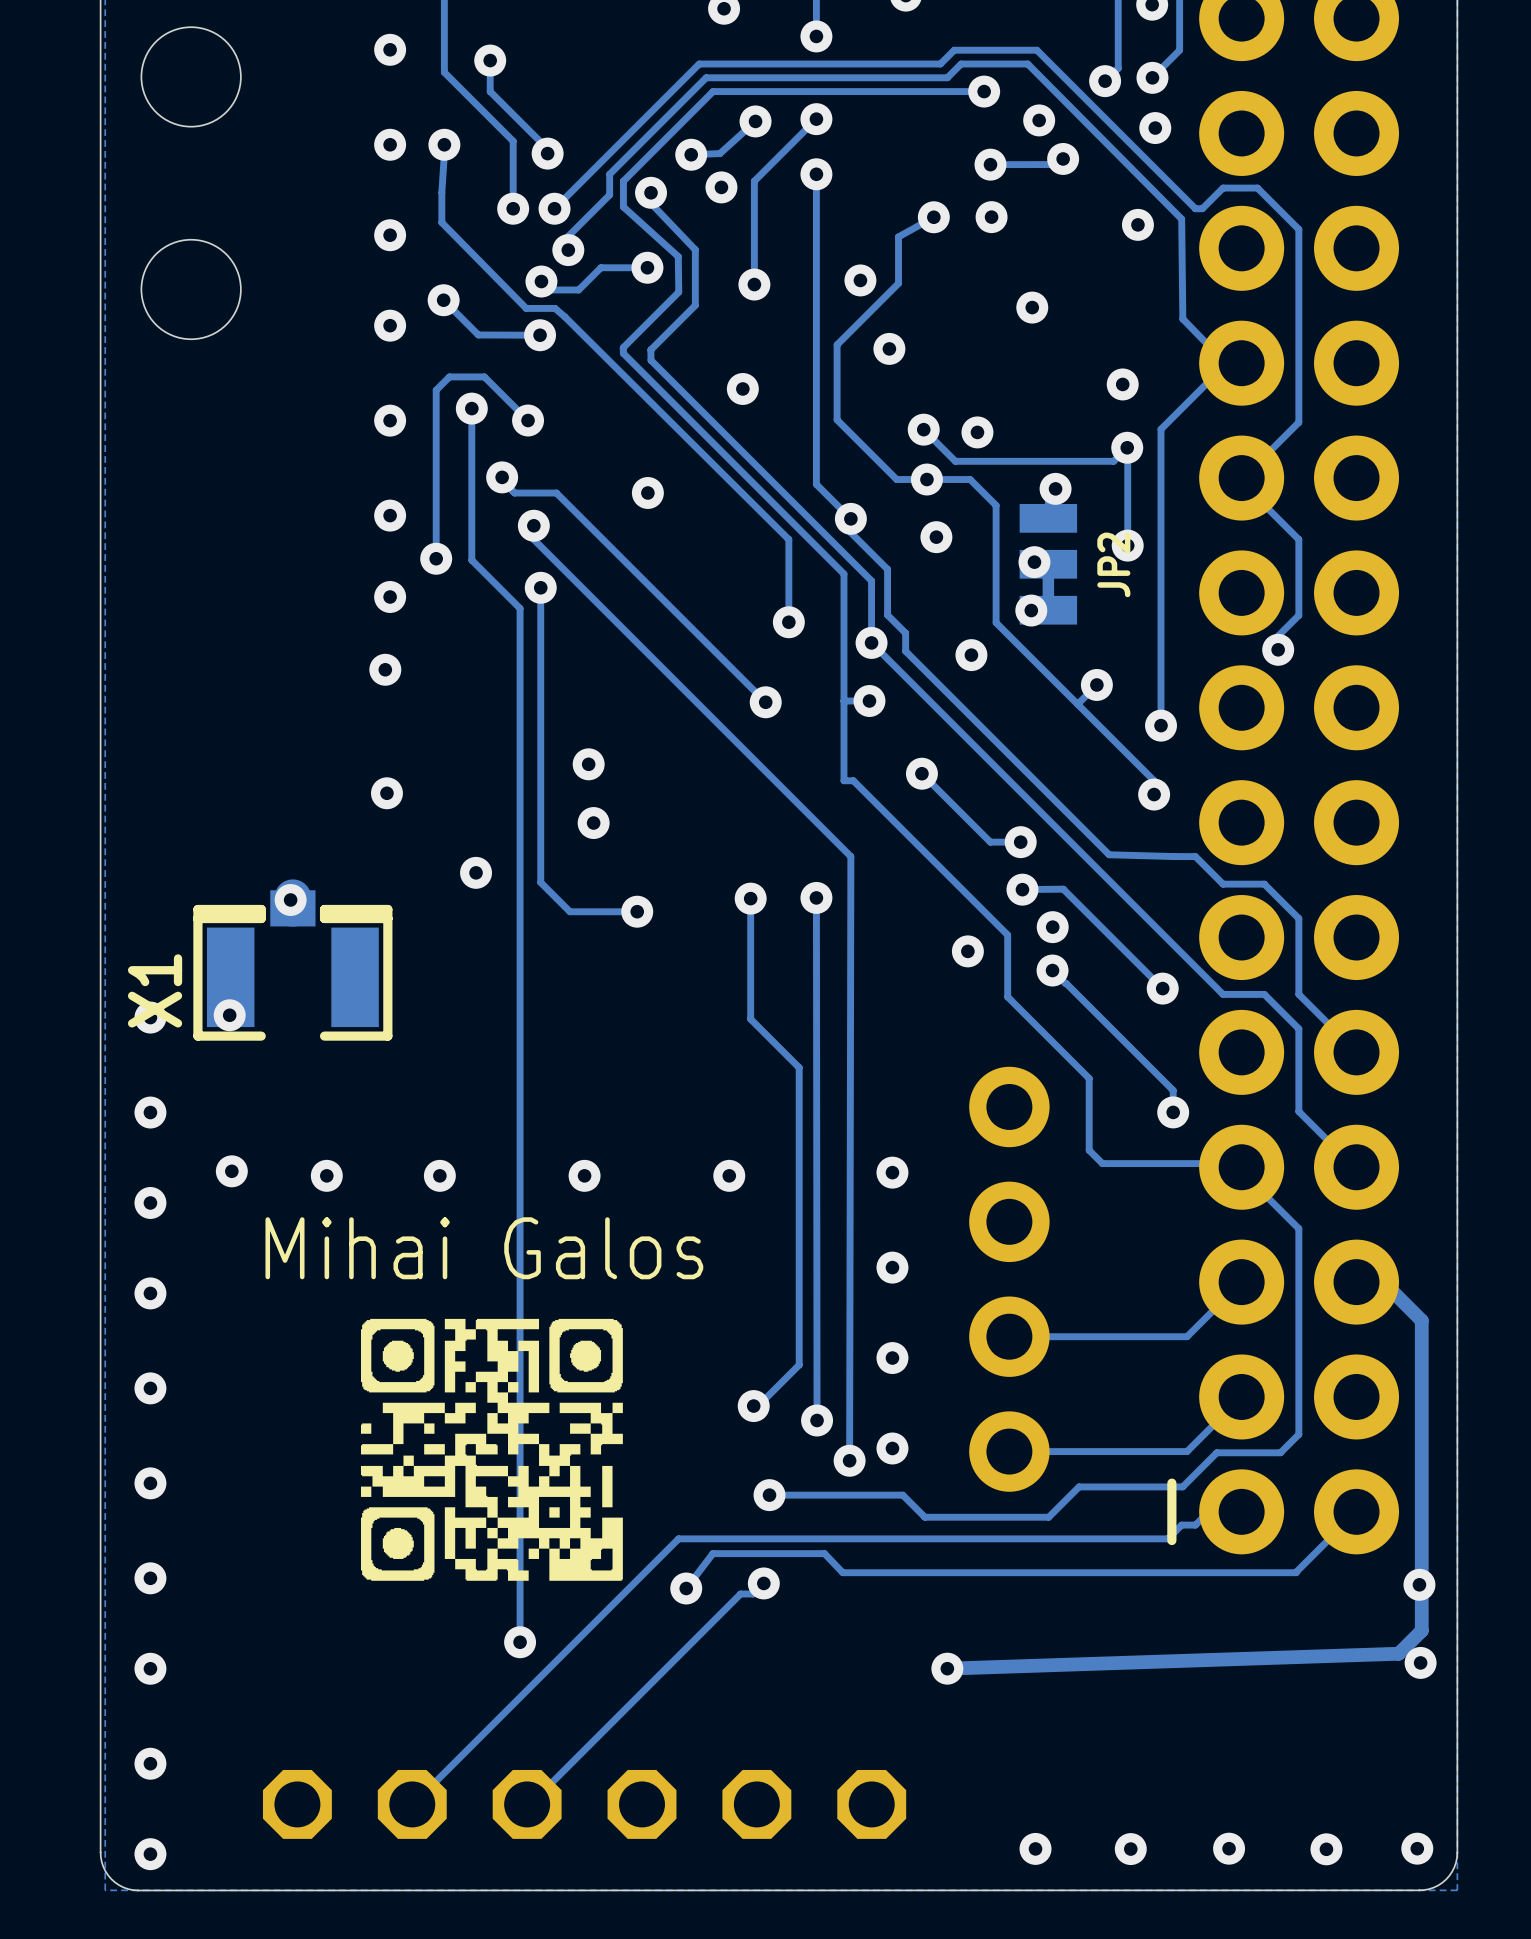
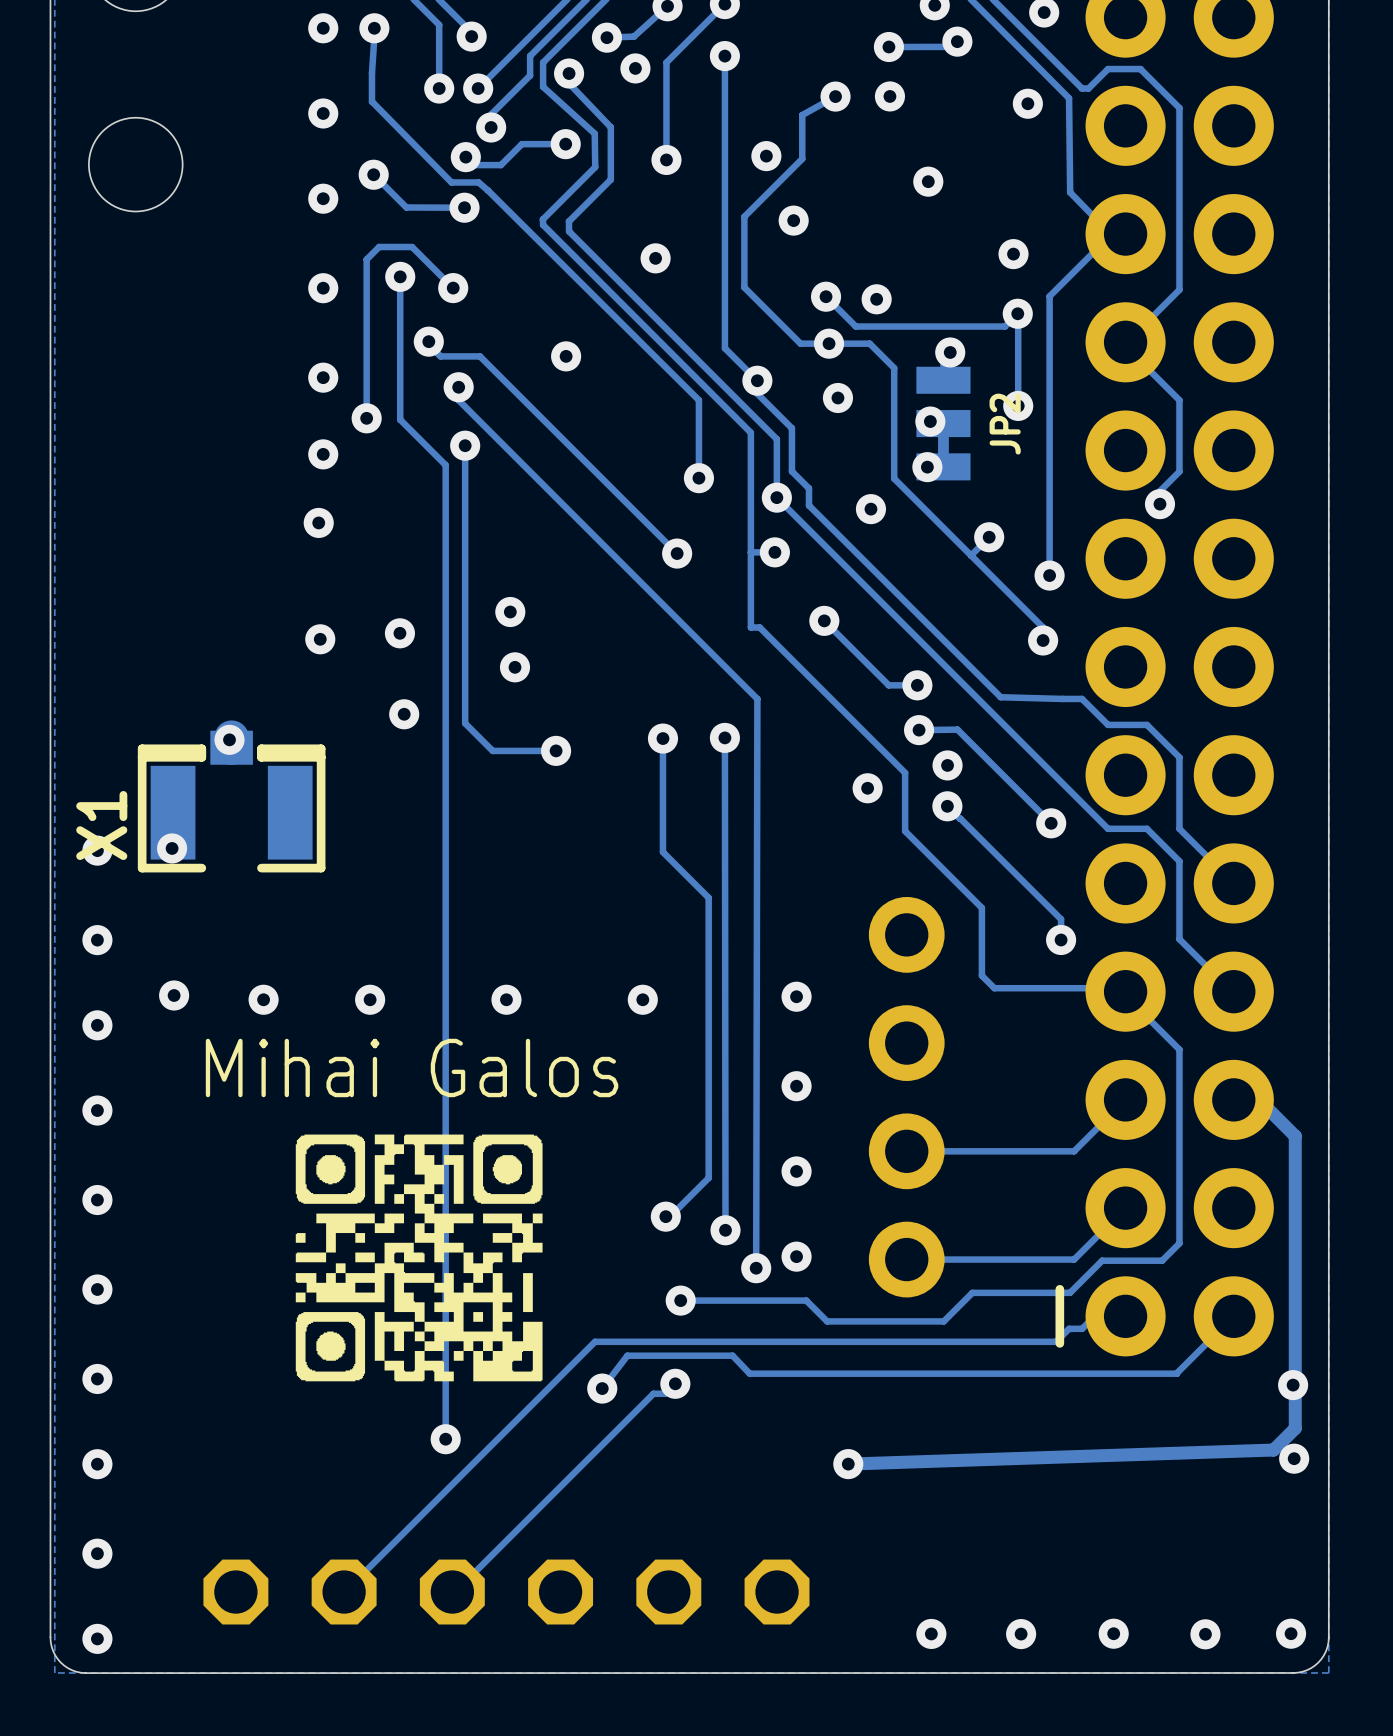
via: none -> (399, 633)

